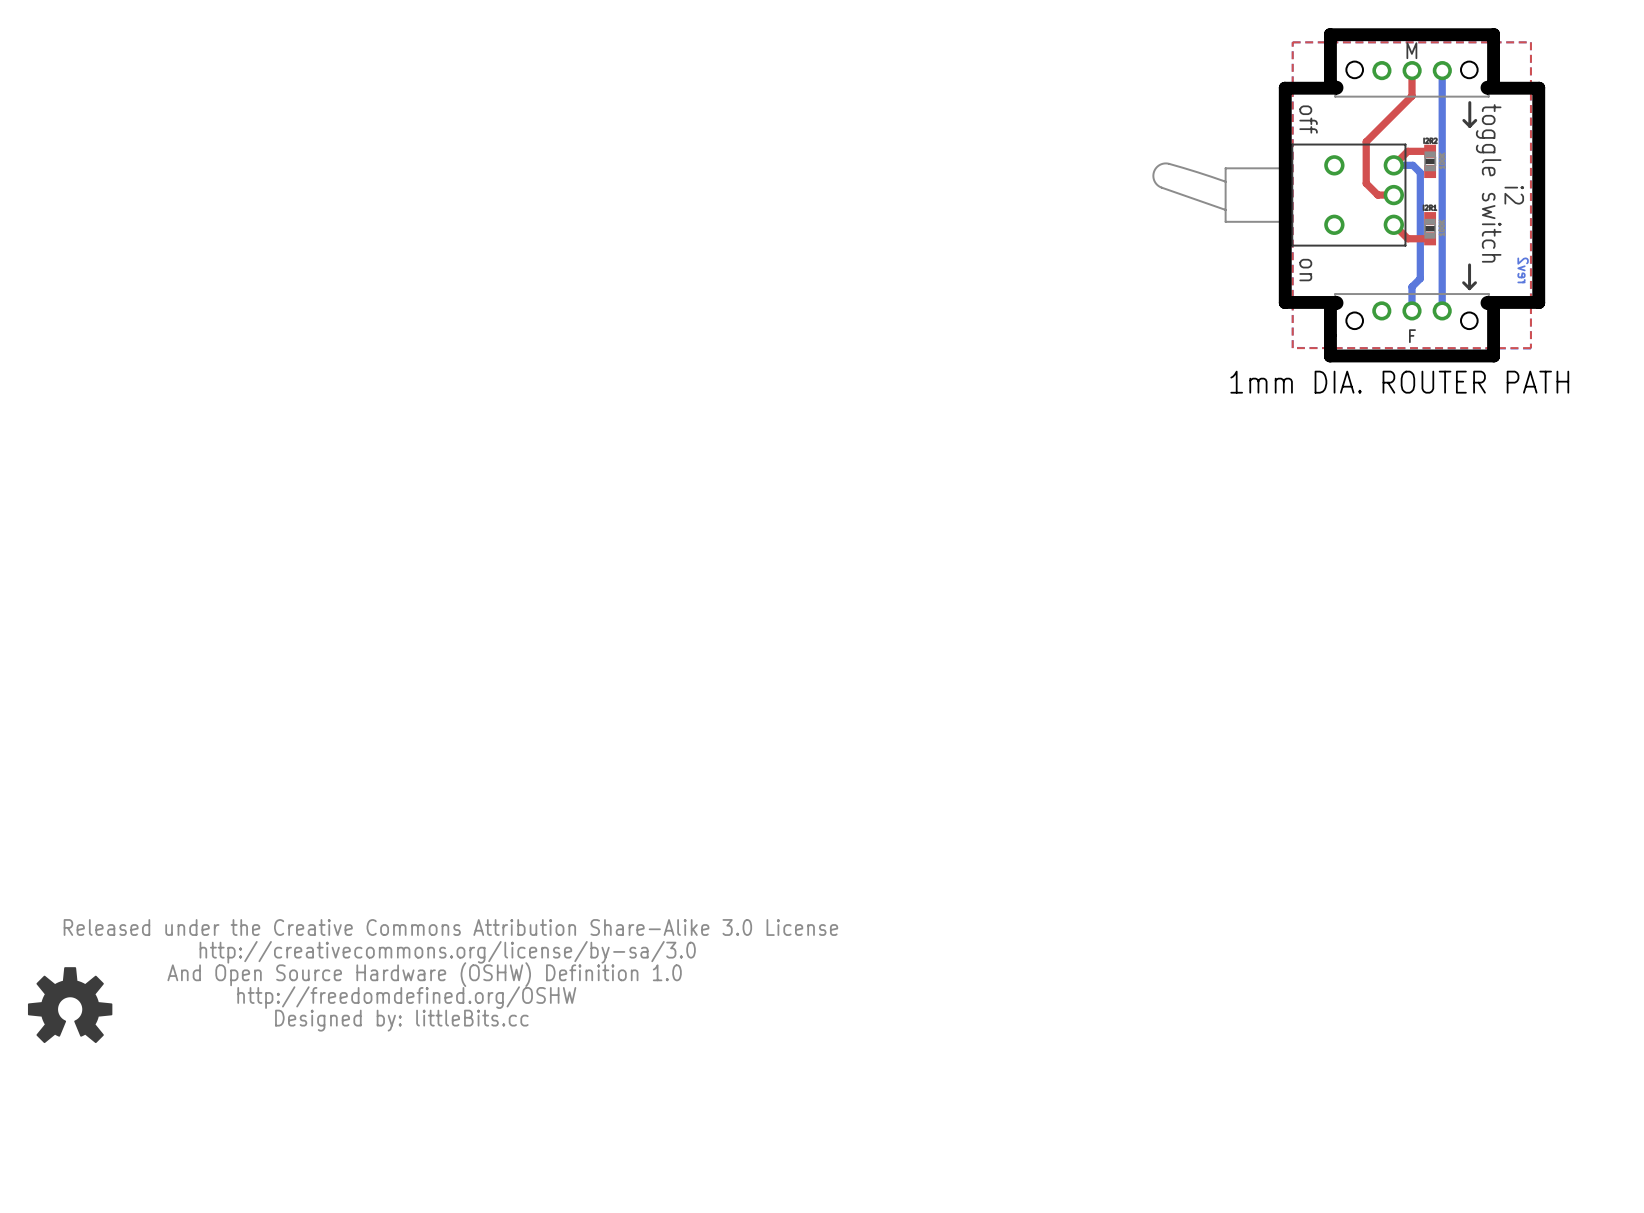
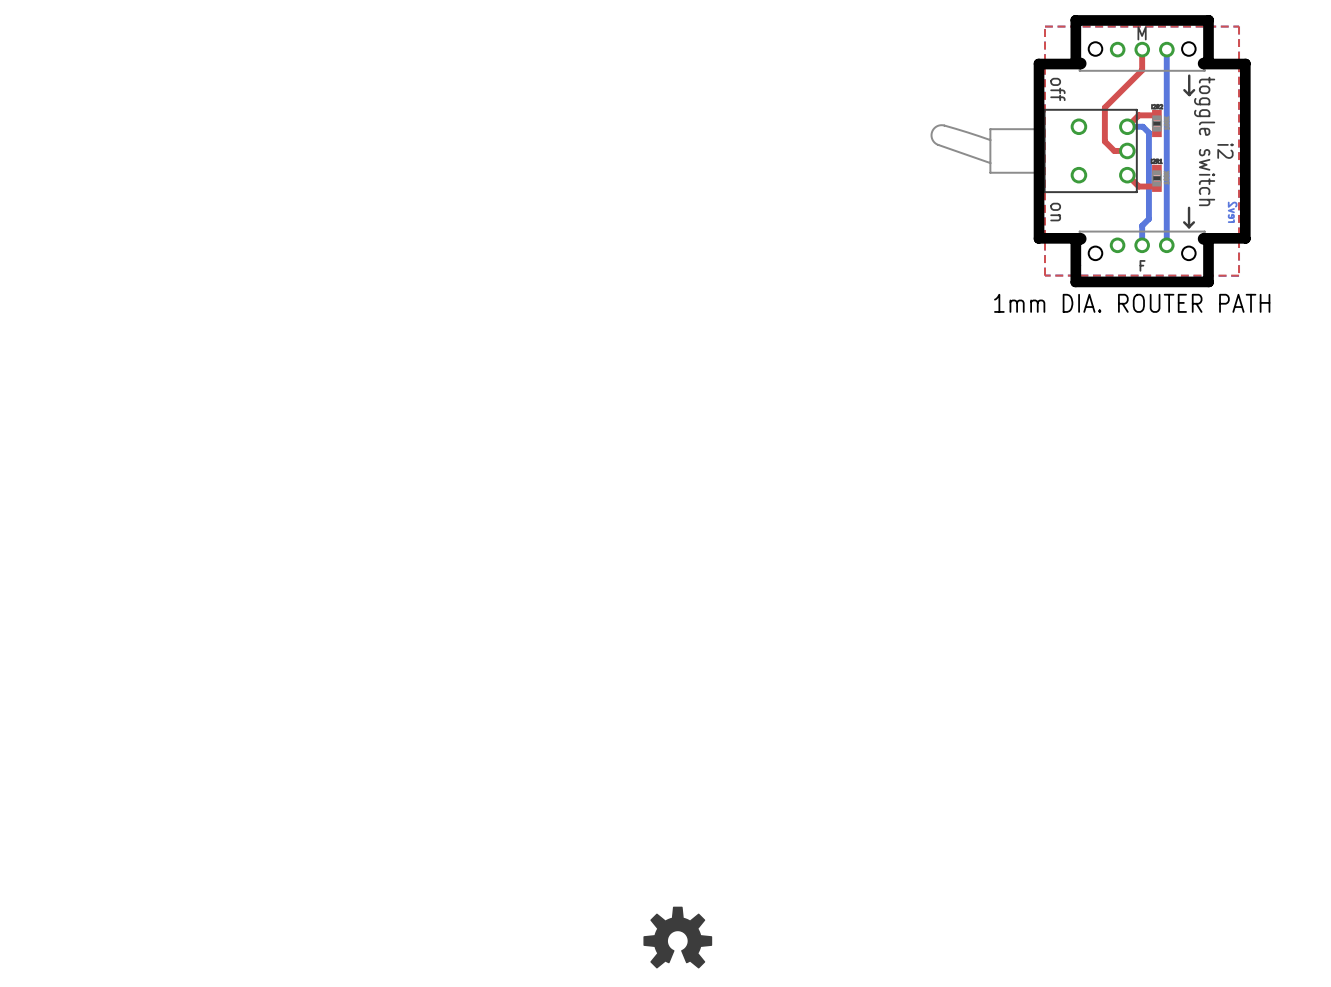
drawing: [27, 967, 113, 1044] -> none
drawing: none -> [643, 906, 713, 969]

